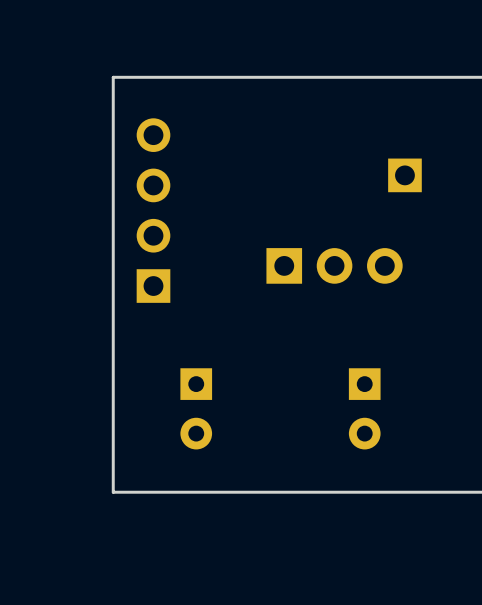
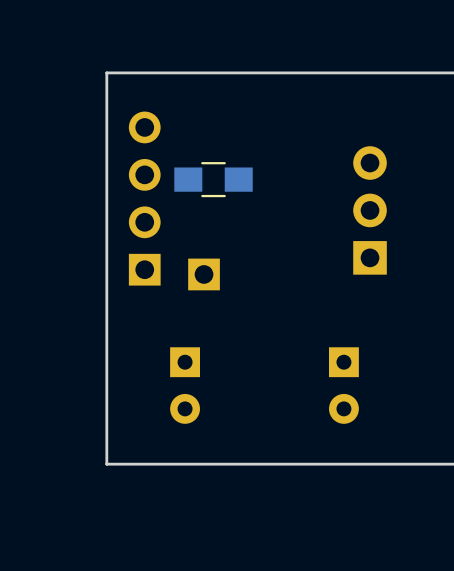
part position: (404, 175) -> (204, 274)
part: none -> (213, 179)
part rotation: 0° (334, 265) -> 90° counterclockwise (370, 210)

